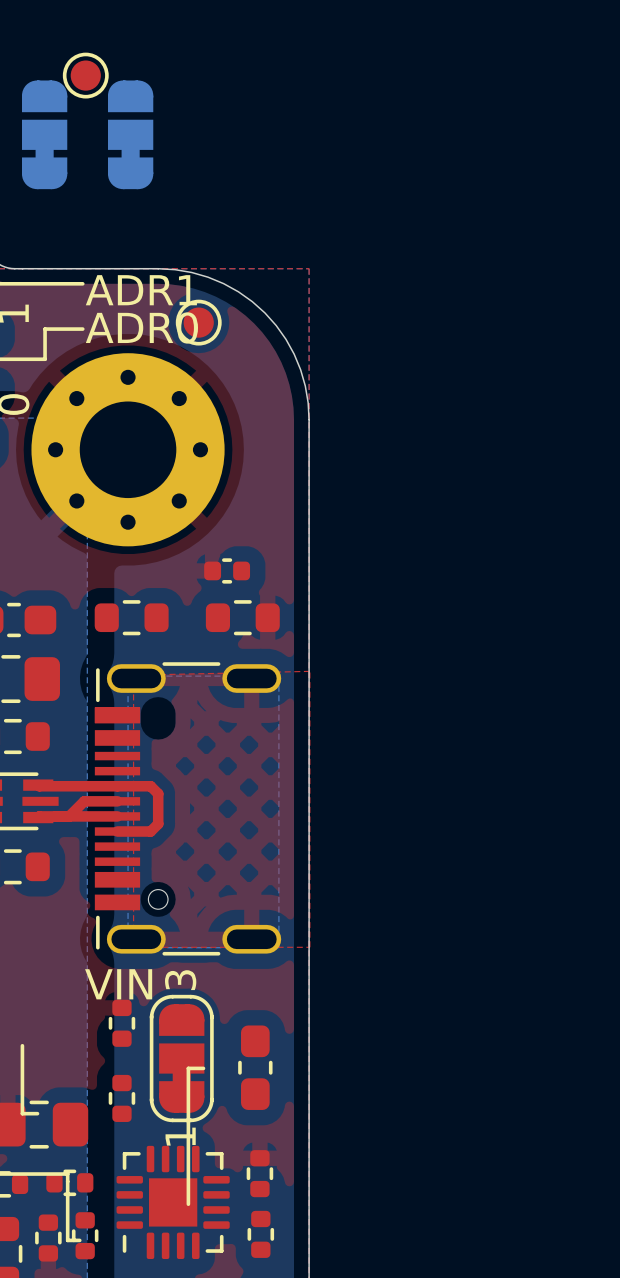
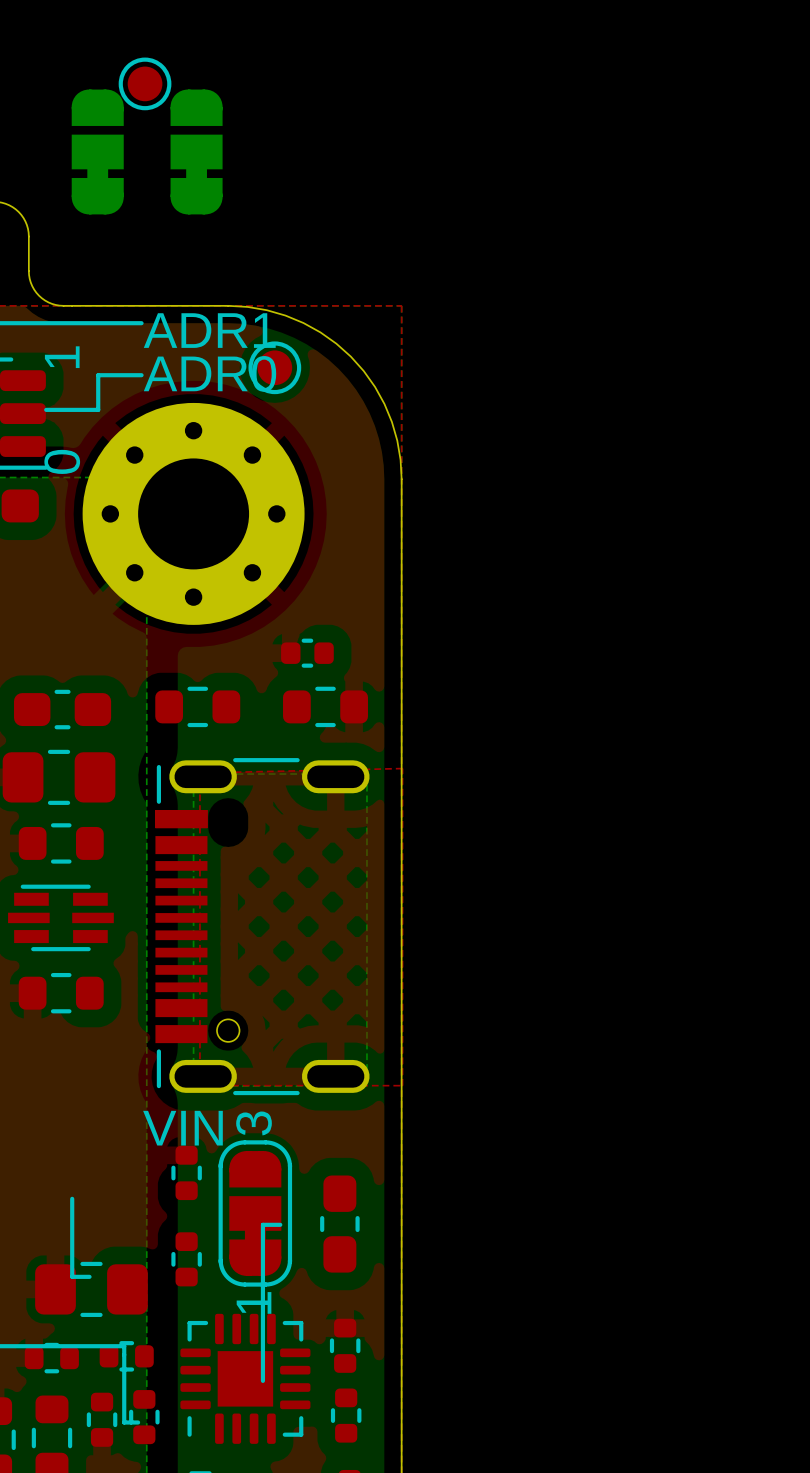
top track: (38, 785) (150, 786) (158, 793) (158, 823) (150, 831) (117, 831) -> none
top track: (117, 801) (84, 801) (69, 816) -> none
top track: (117, 816) (38, 817) -> none

